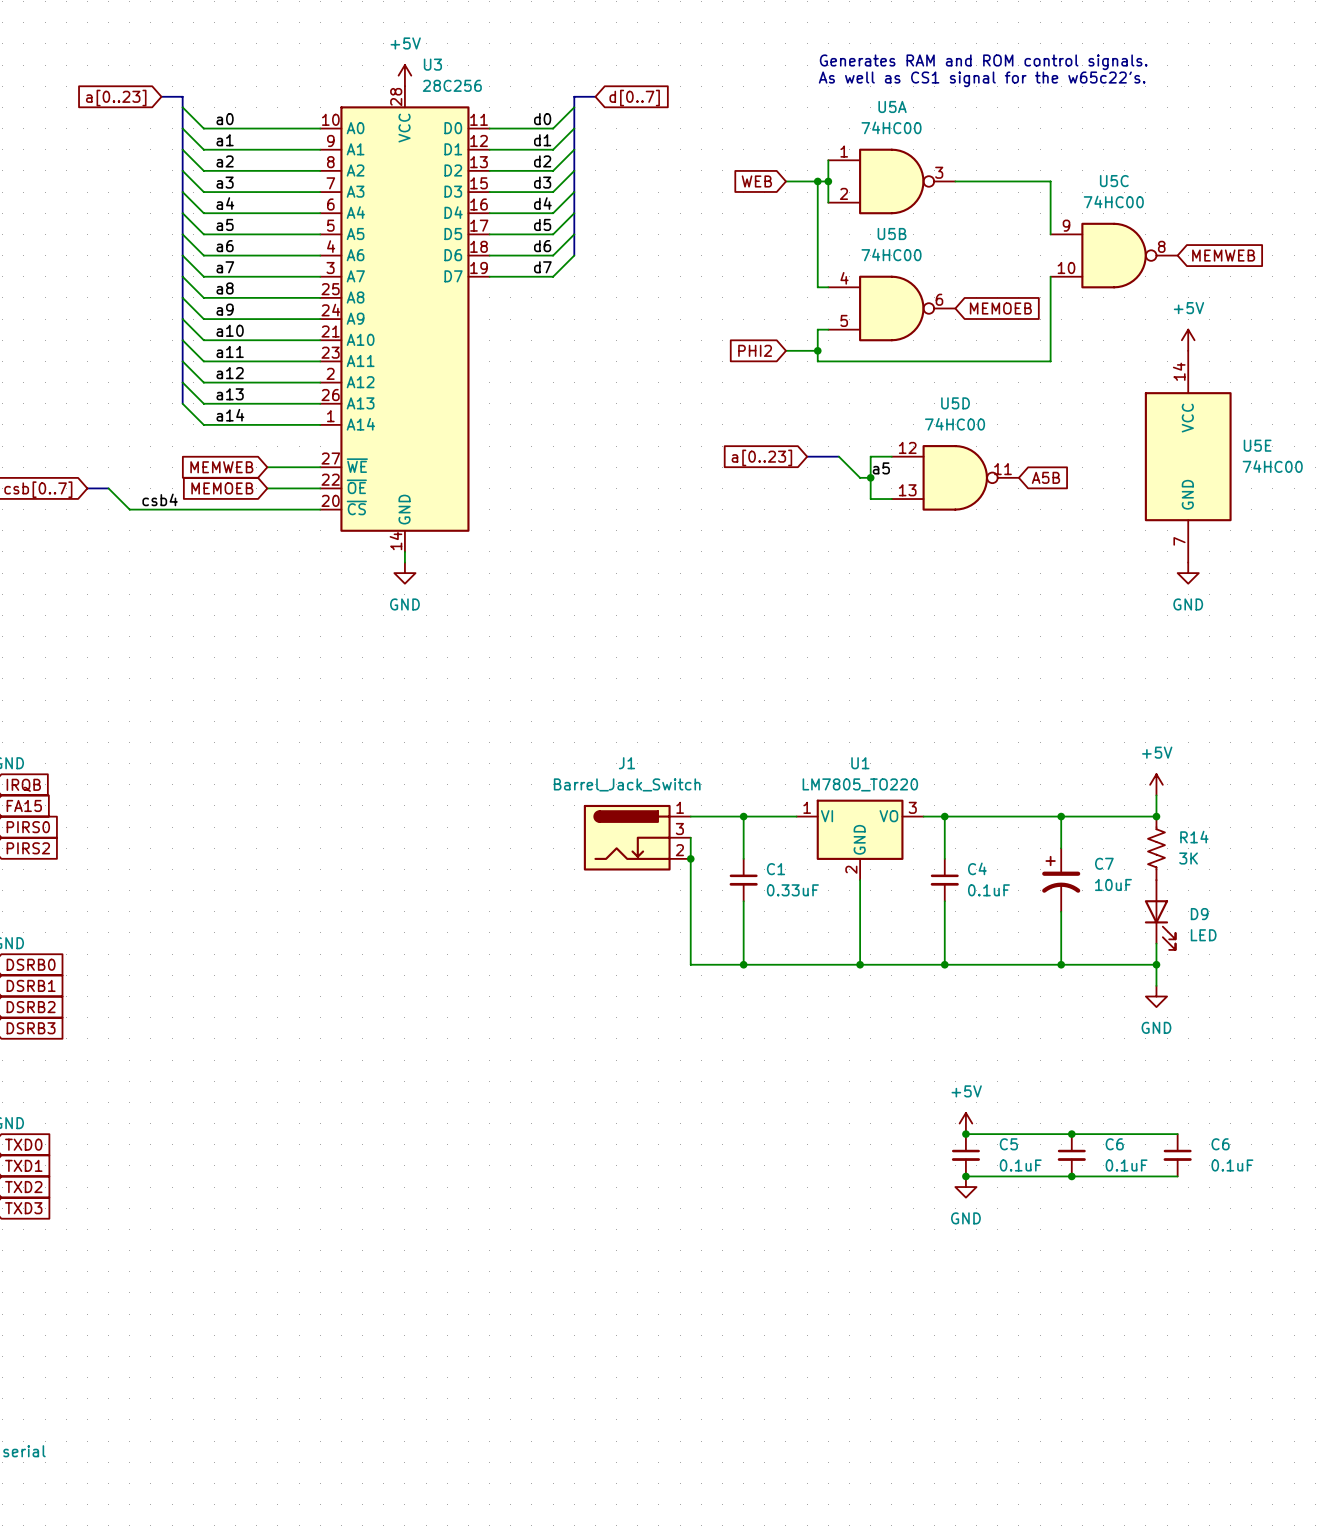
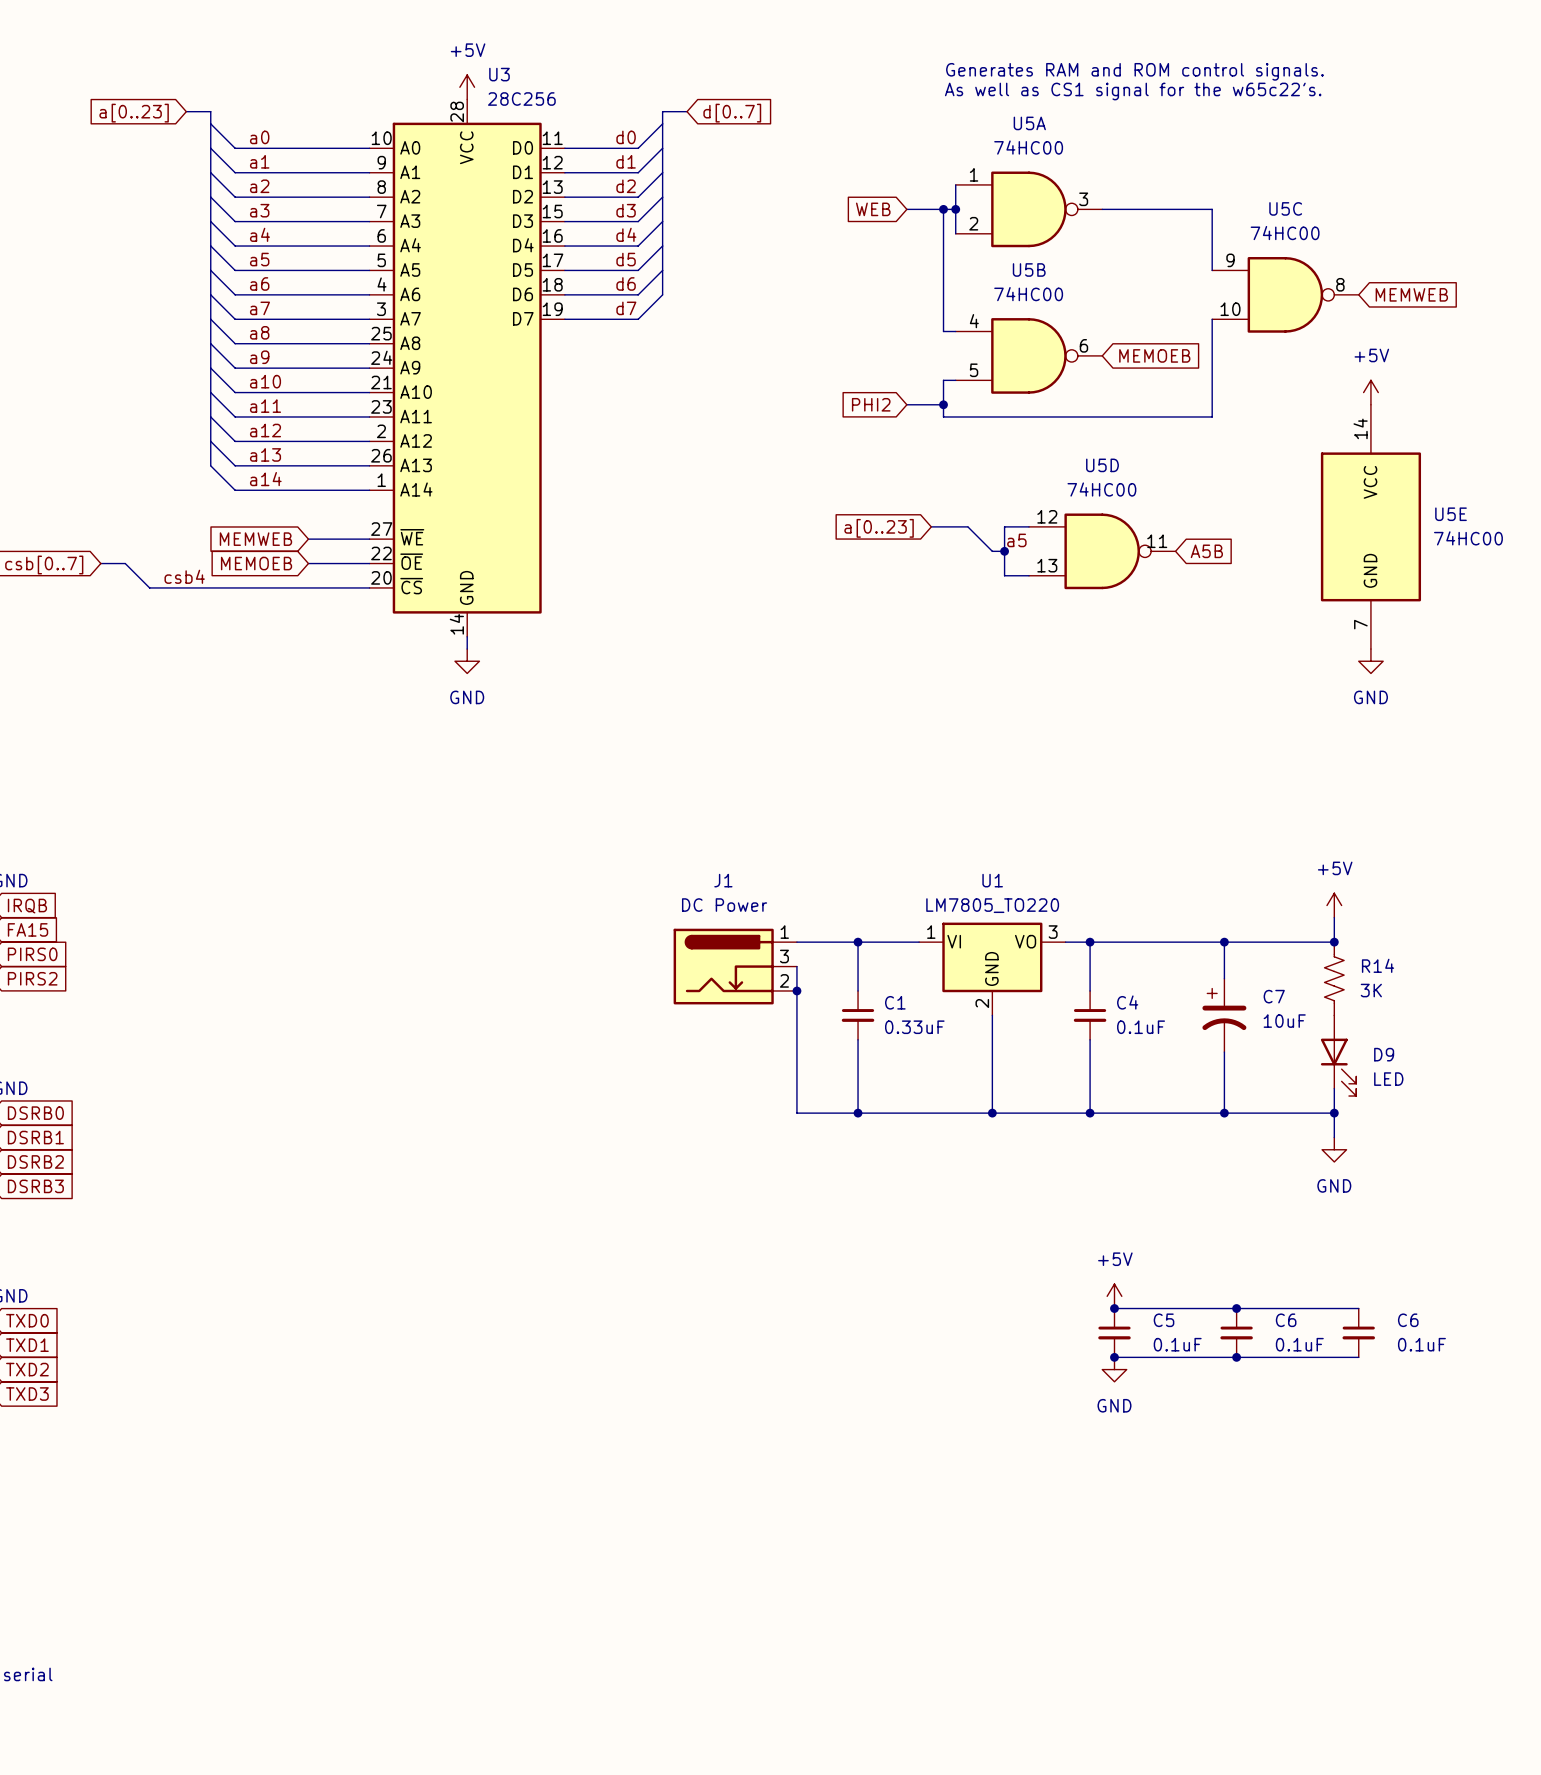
J1 value: Barrel_Jack_Switch (627, 784) -> DC Power (724, 905)

